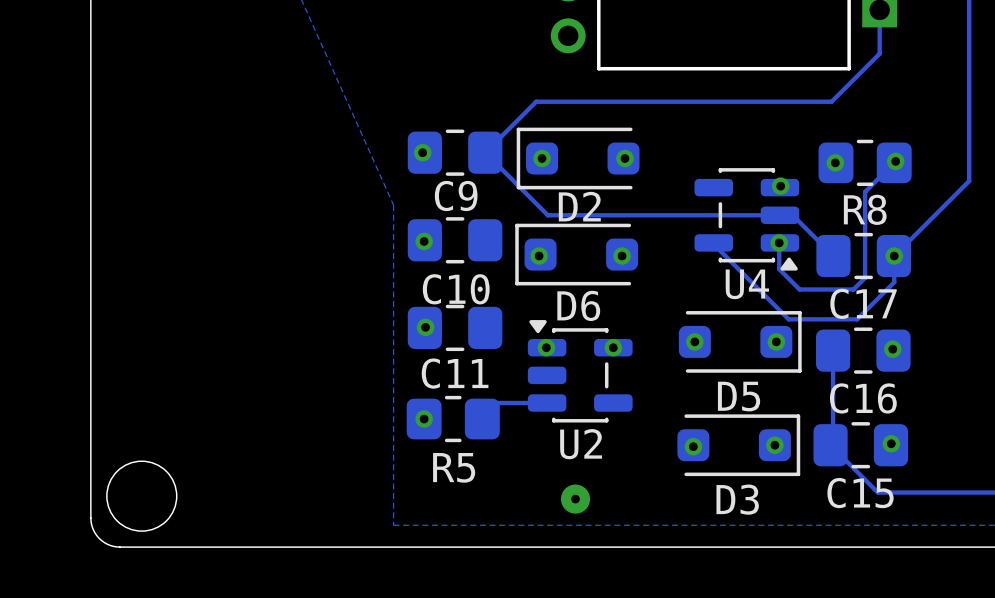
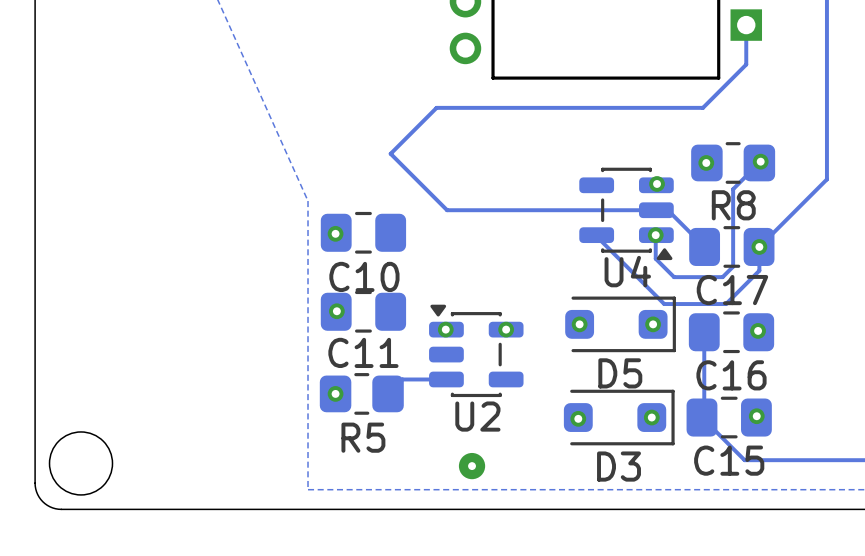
via: (422, 152) -> none
C9: (455, 152) -> none
via: (542, 158) -> none
D2: (578, 158) -> none
via: (624, 158) -> none
D6: (576, 254) -> none
via: (539, 256) -> none
via: (622, 256) -> none

